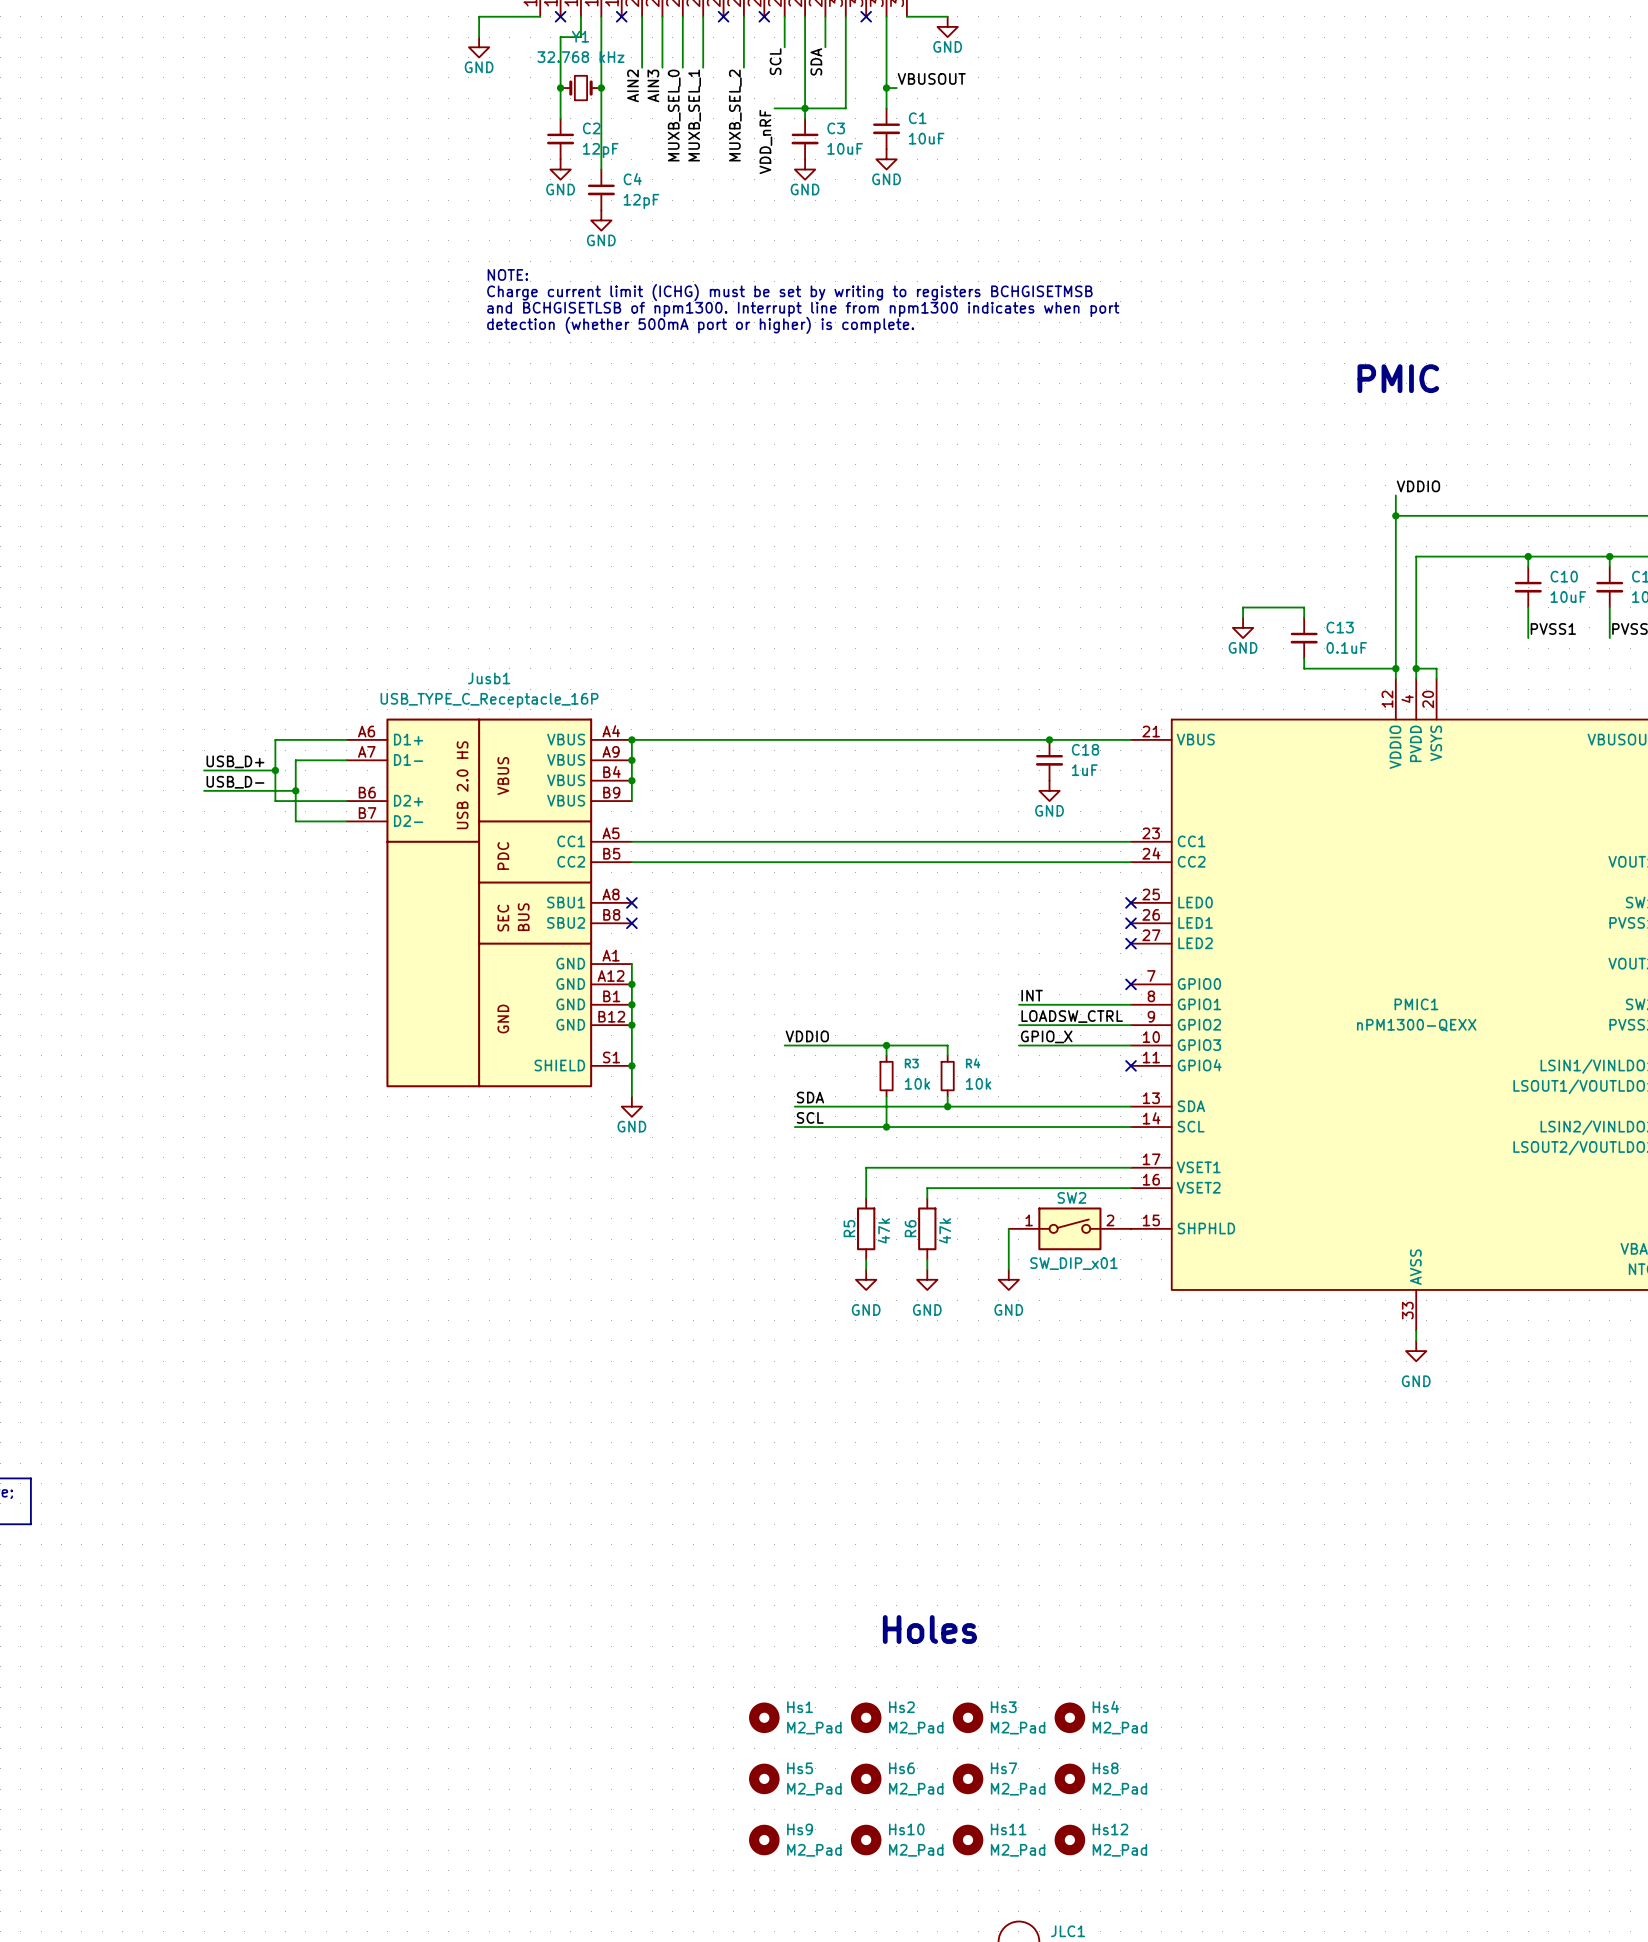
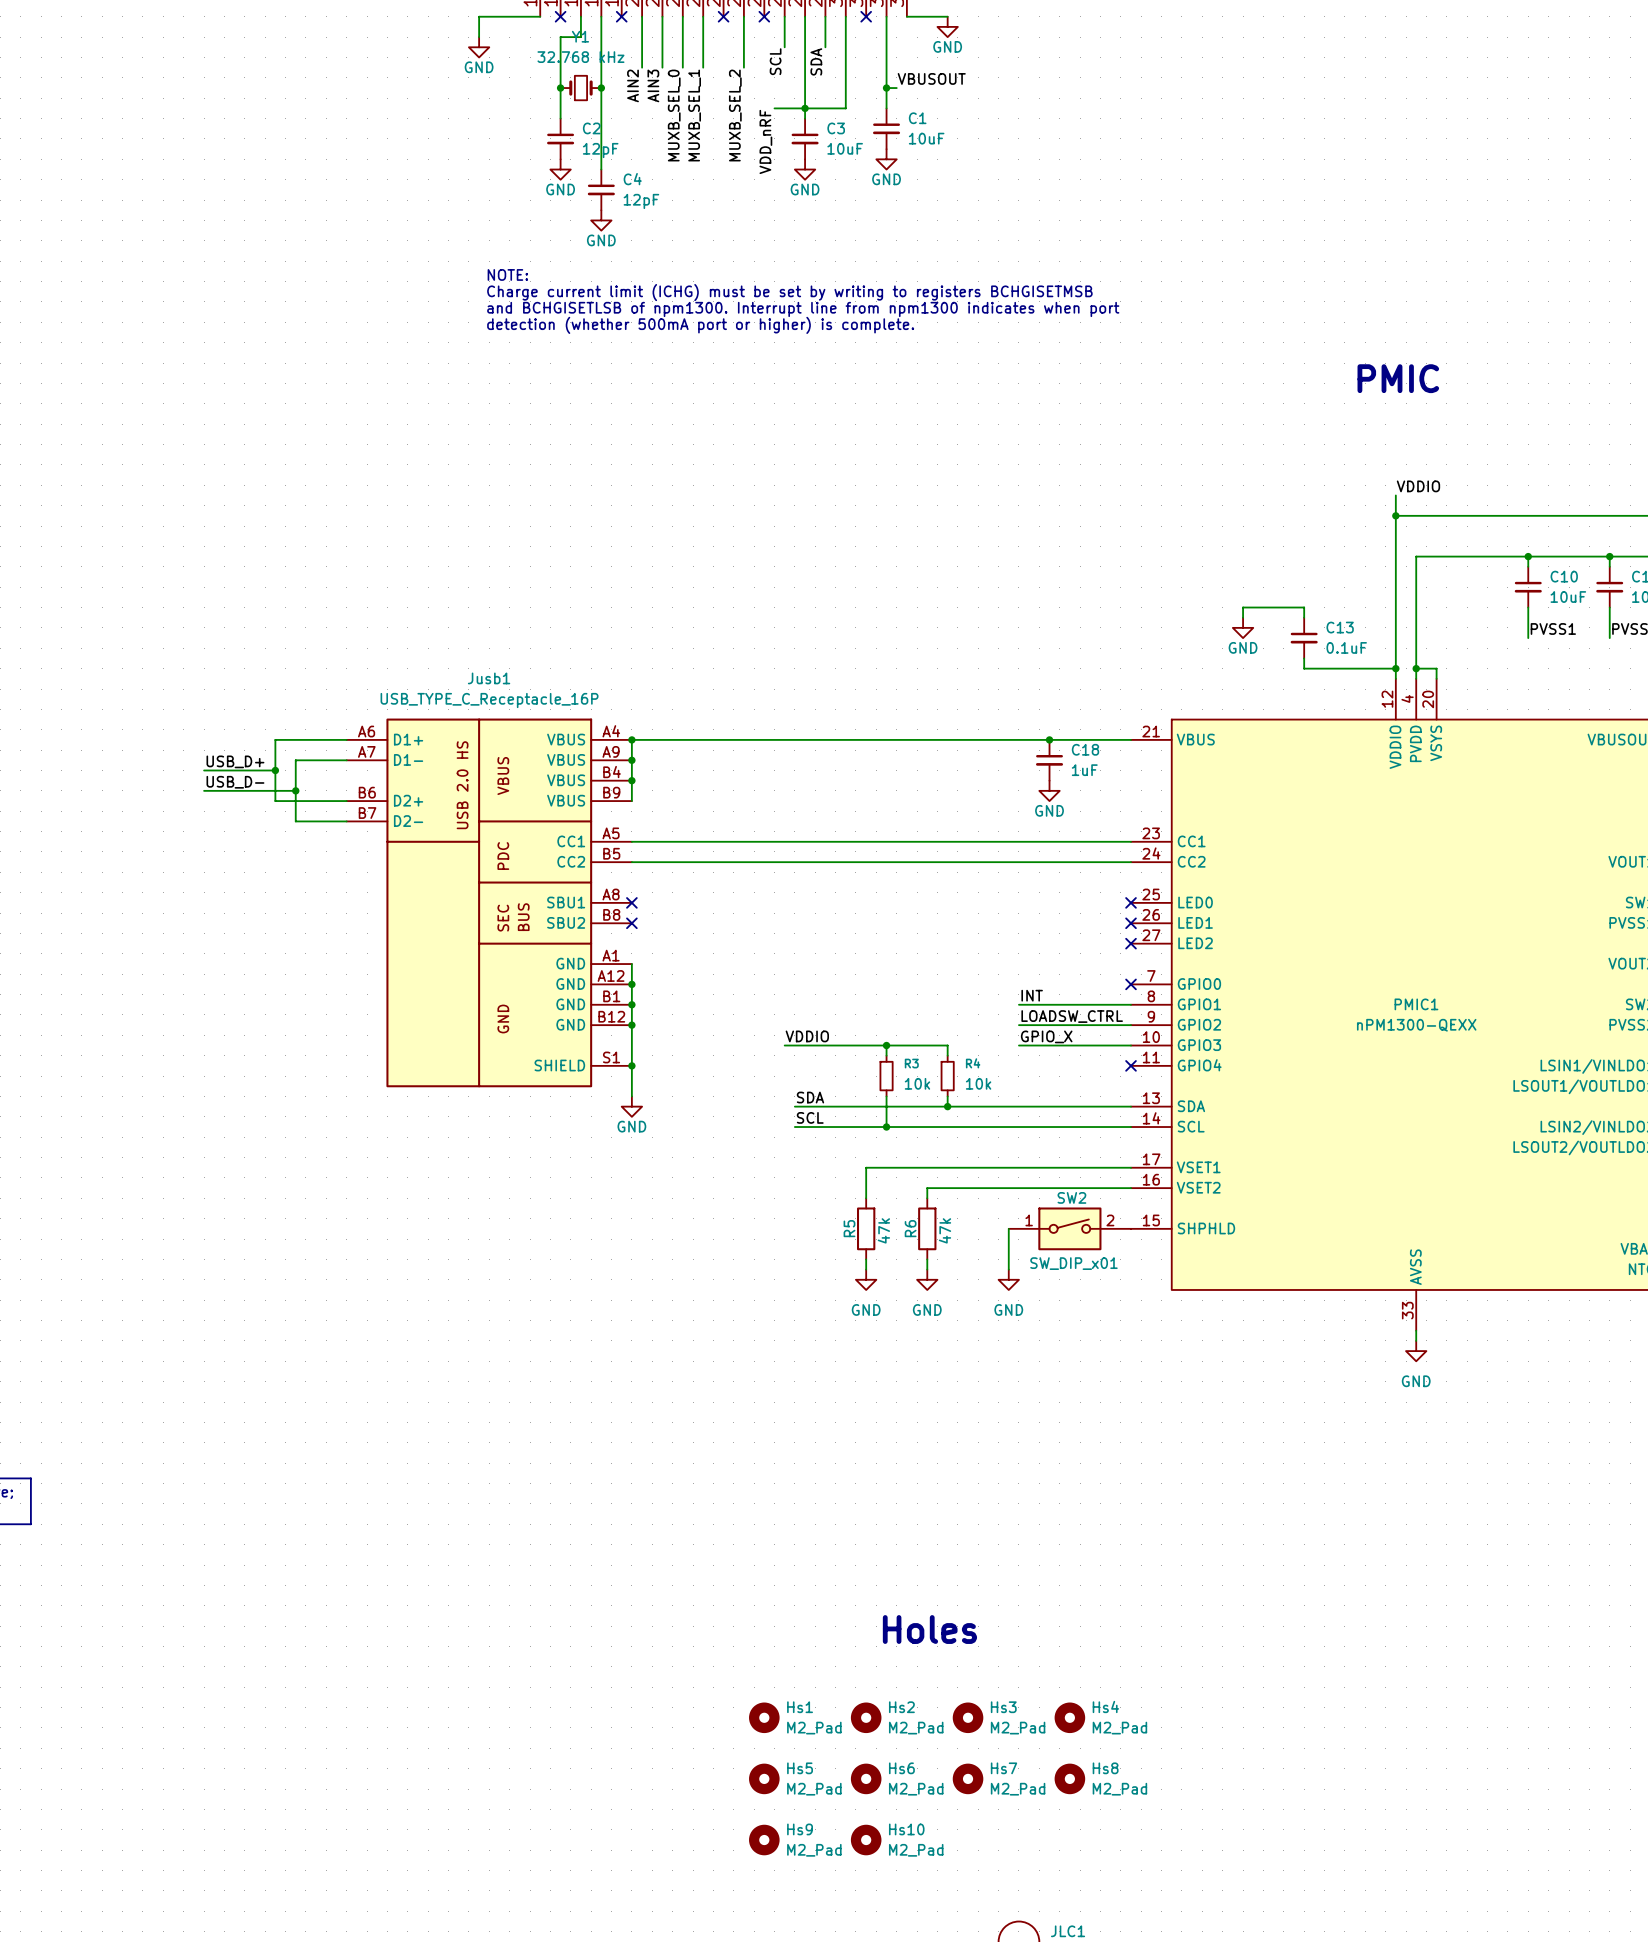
Hs11: M2_Pad (968, 1840) -> none
Hs12: M2_Pad (1069, 1840) -> none

